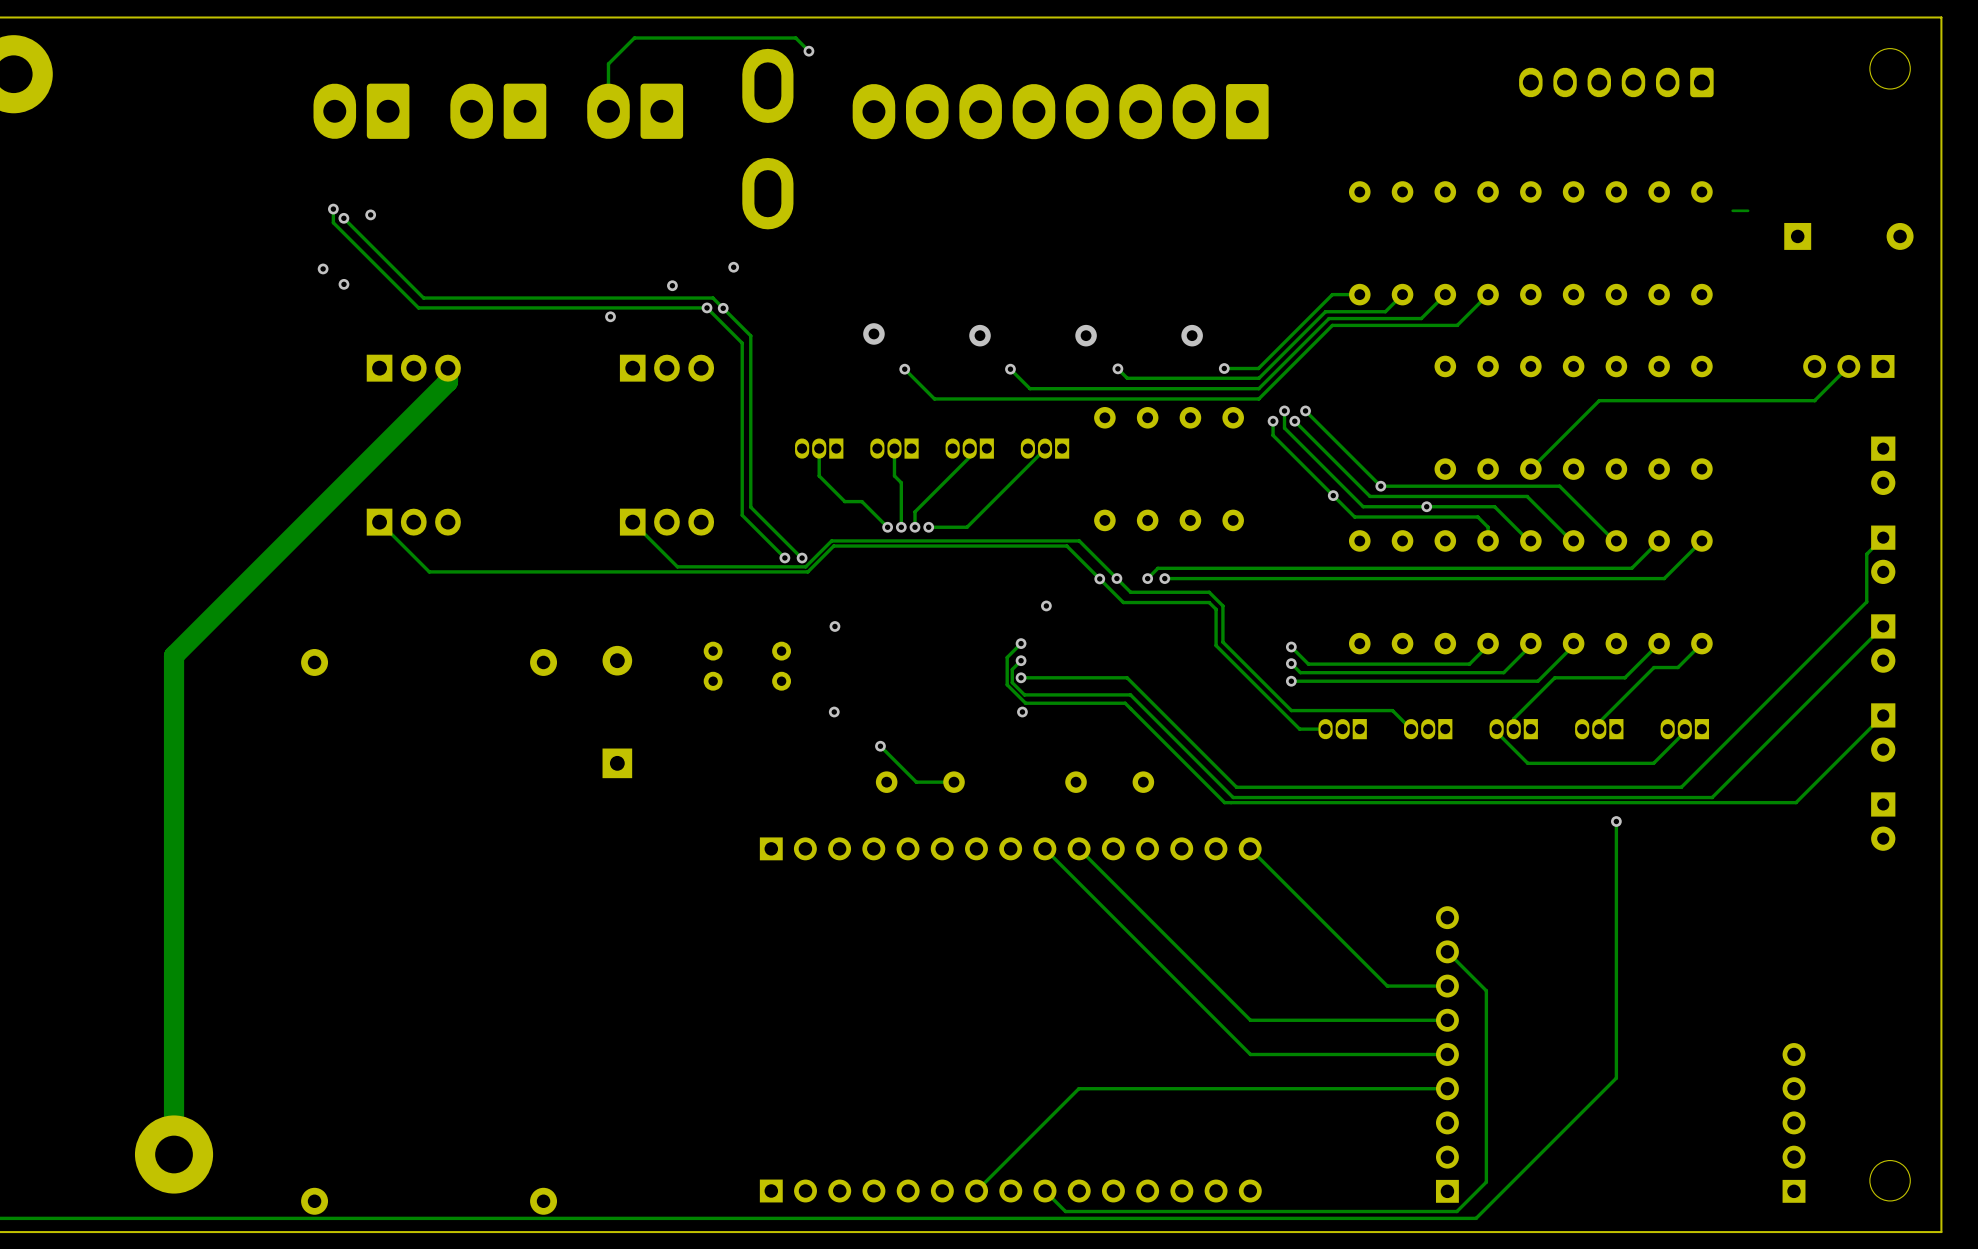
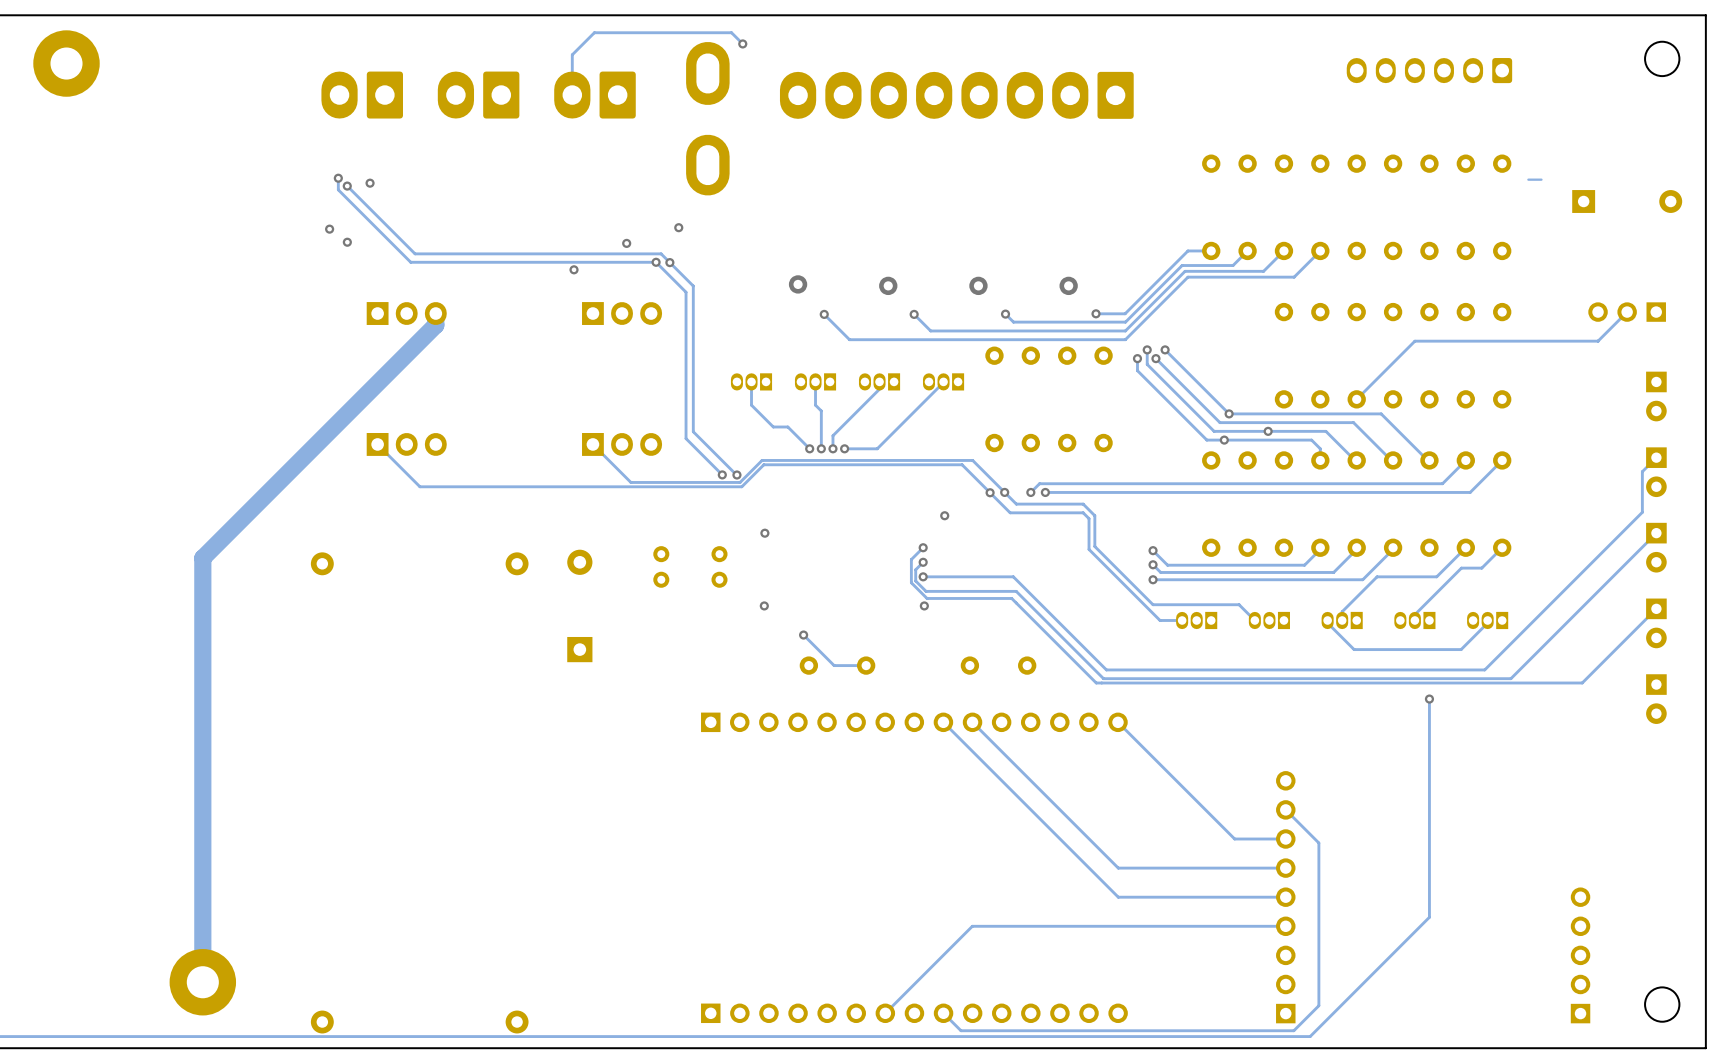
via position: (1333, 495) -> (1224, 440)

